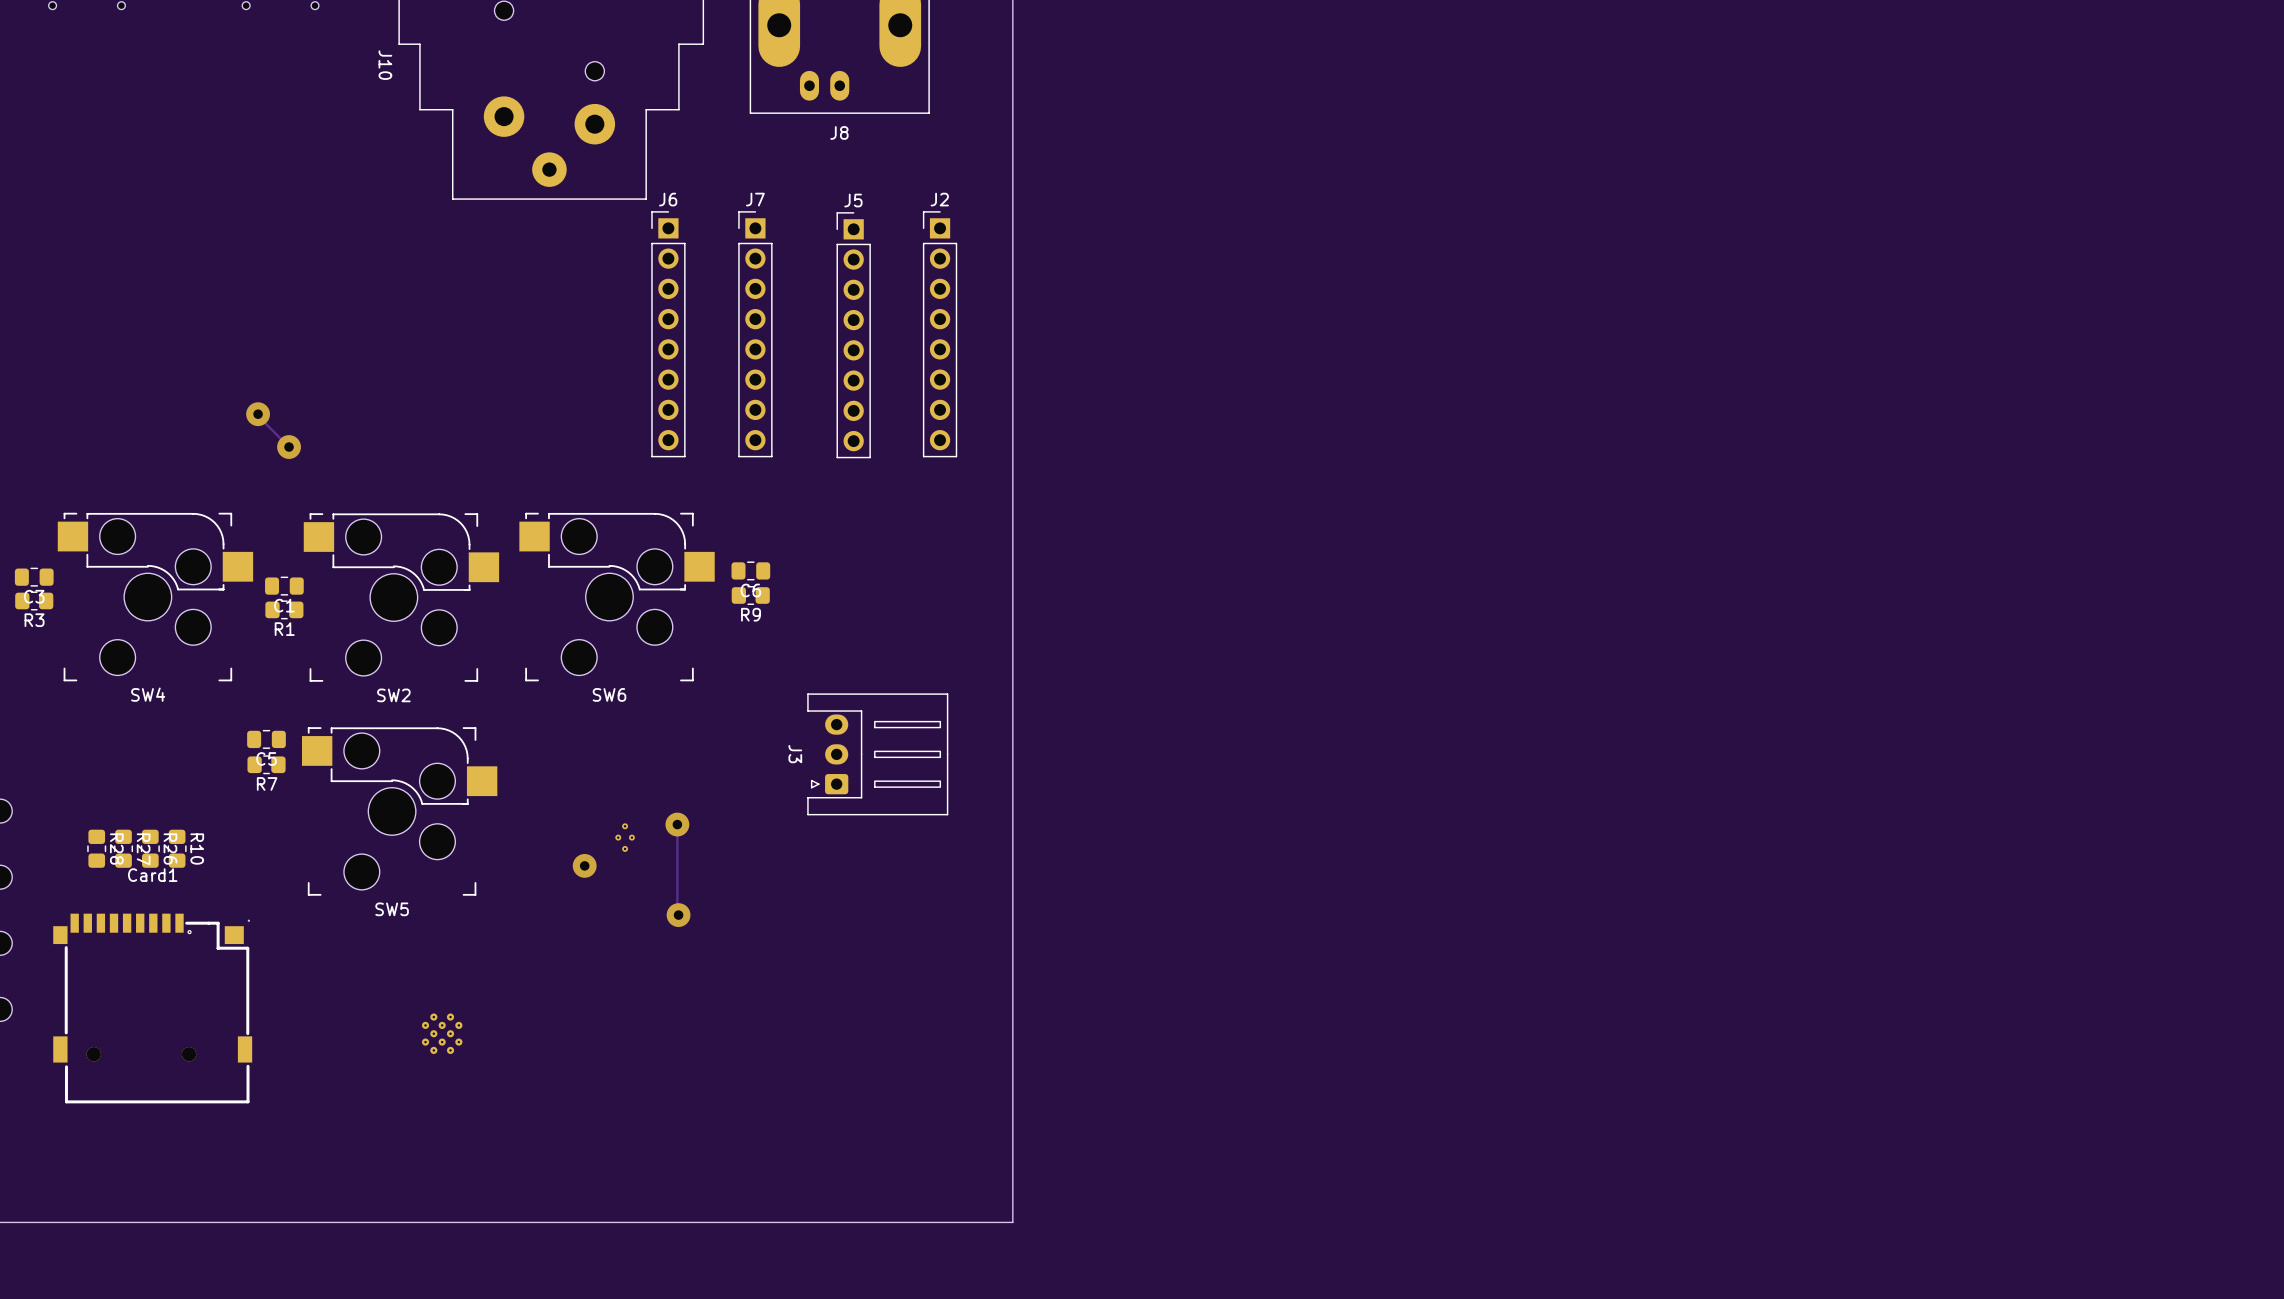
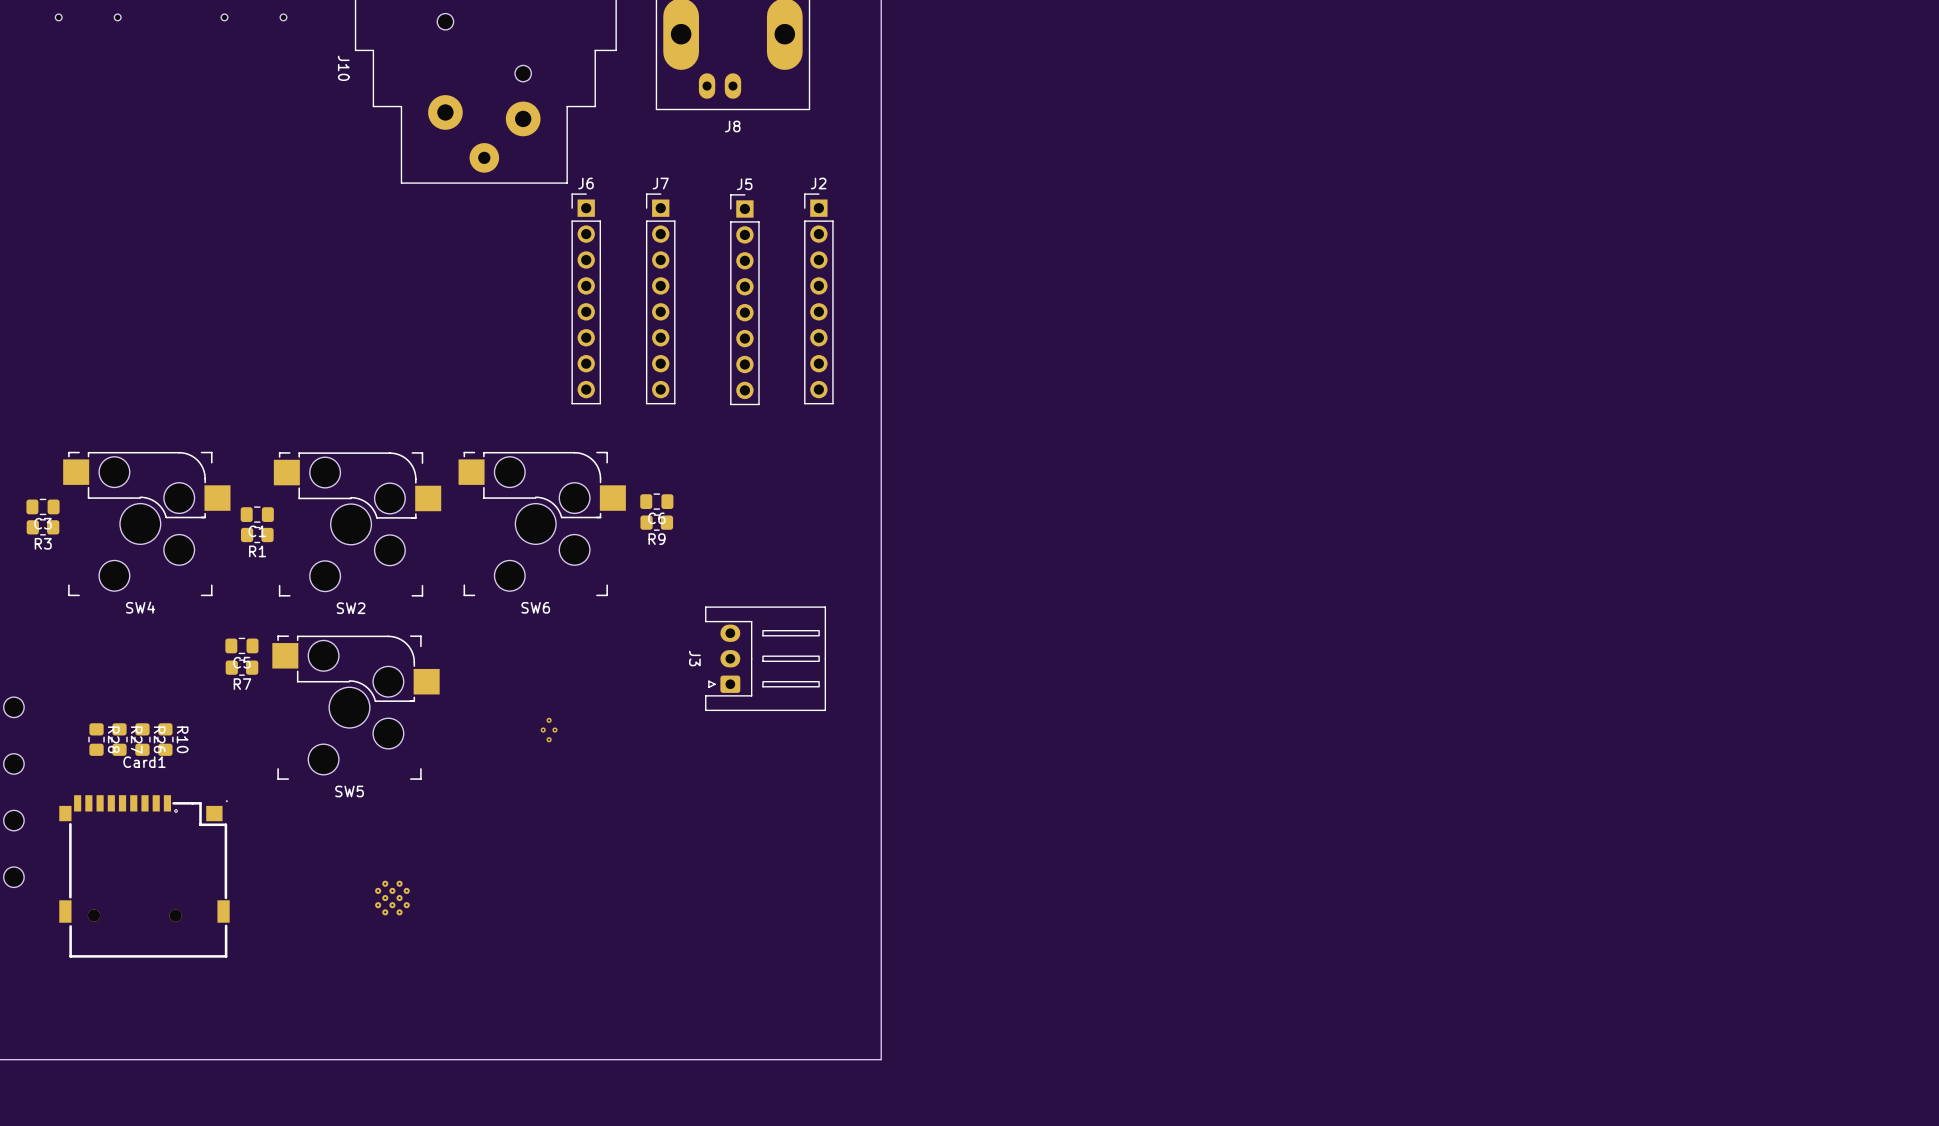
track: (258, 414) (289, 447) -> none
via: (258, 414) -> none
via: (289, 447) -> none
track: (677, 824) (678, 915) -> none
via: (677, 824) -> none
via: (584, 865) -> none
via: (678, 915) -> none

